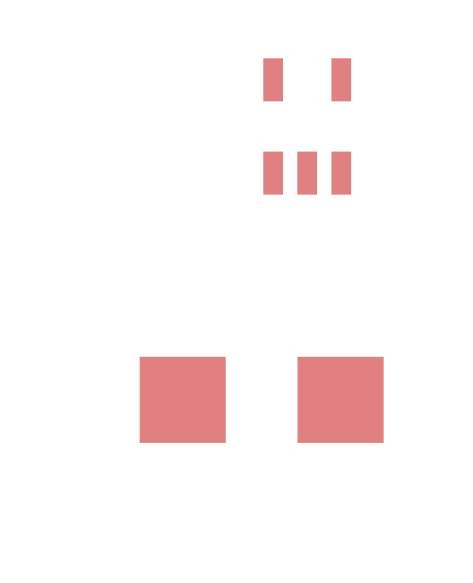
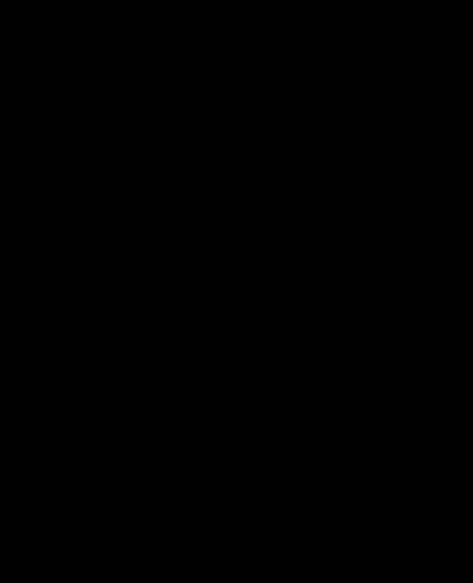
part: (307, 126) -> none
part: (261, 399) -> none

